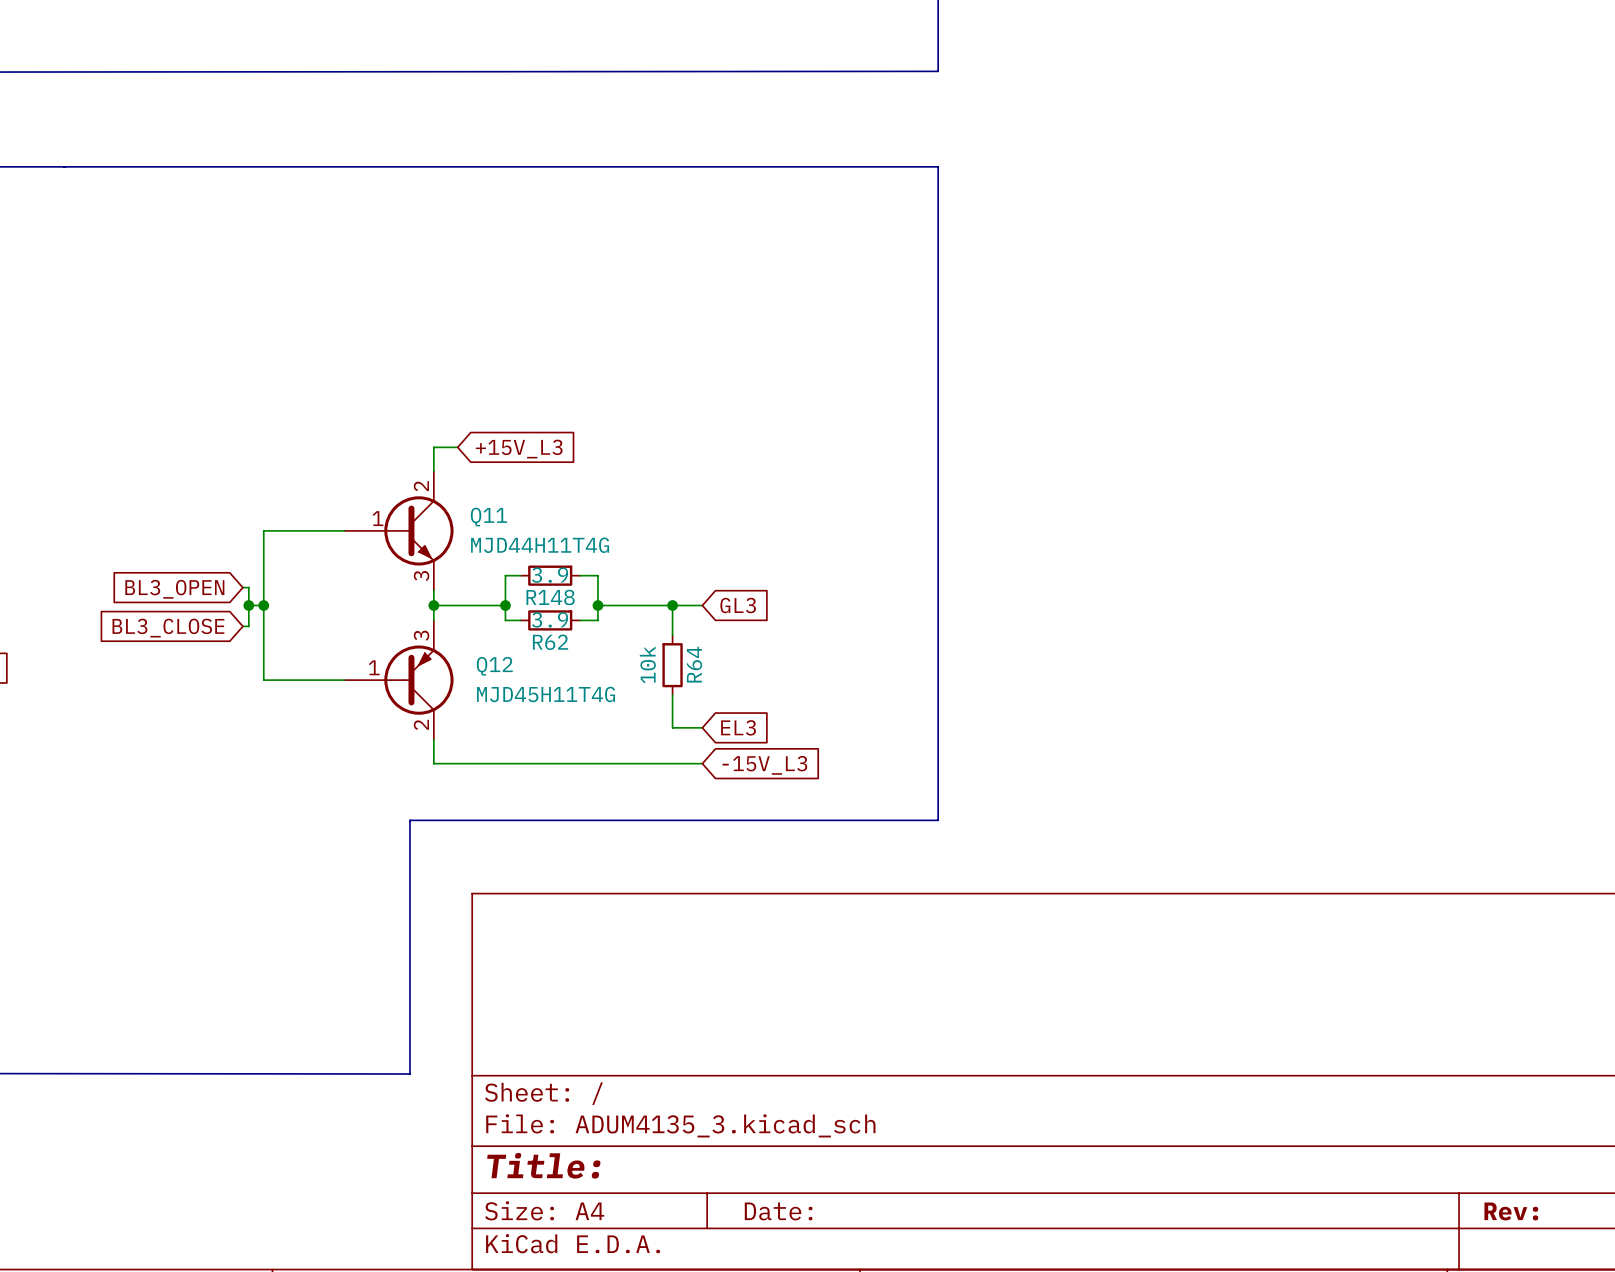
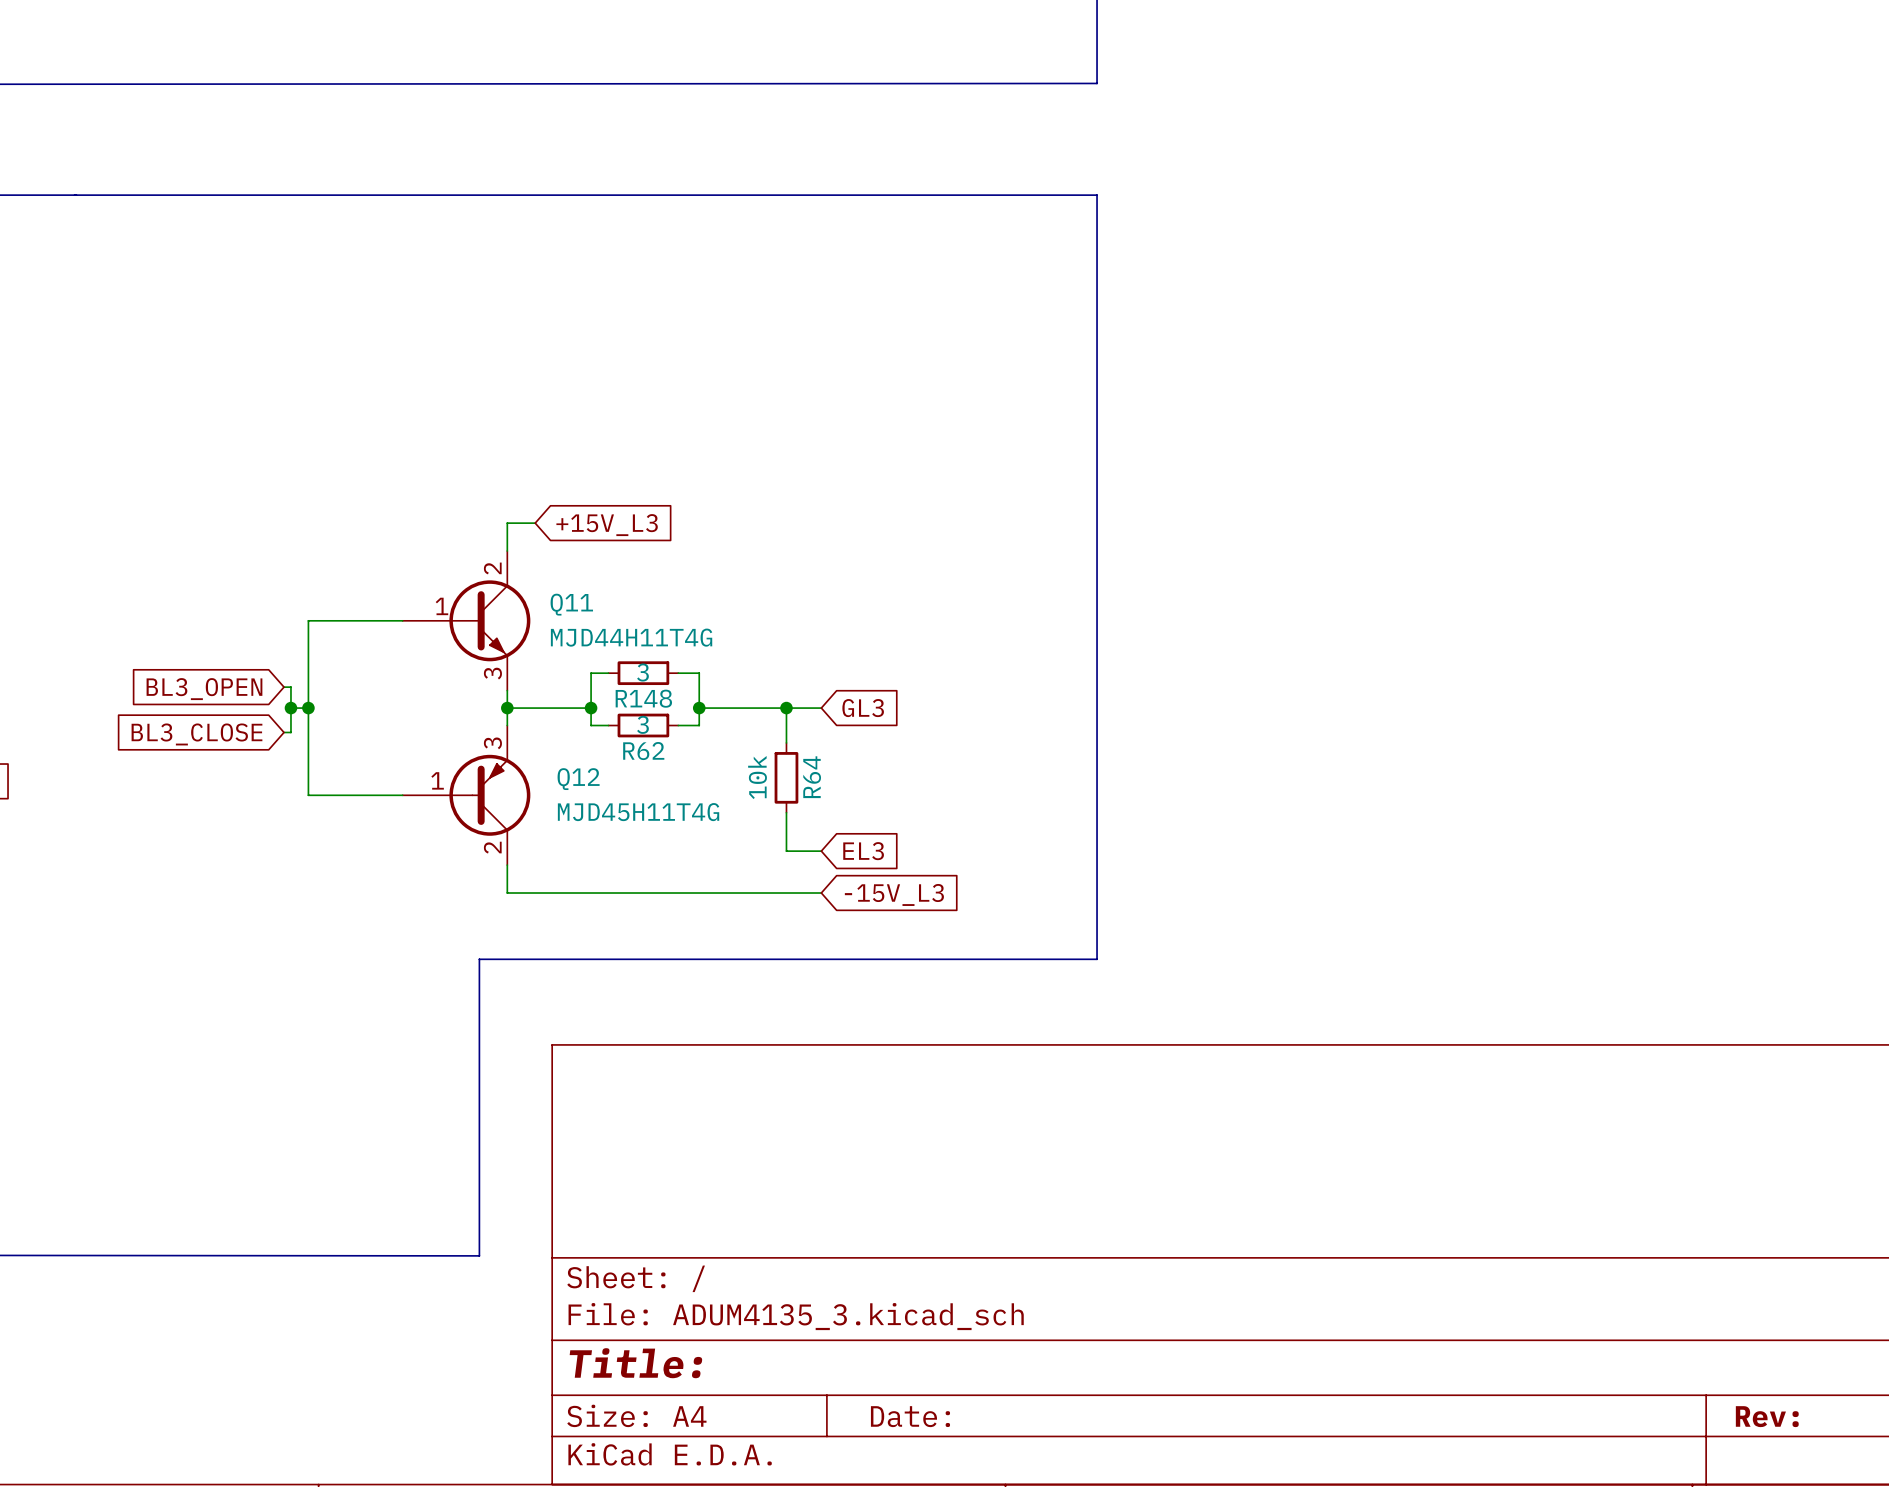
R148 value: 3.9 (550, 575) -> 3 (642, 672)
R62 value: 3.9 (550, 619) -> 3 (642, 724)

